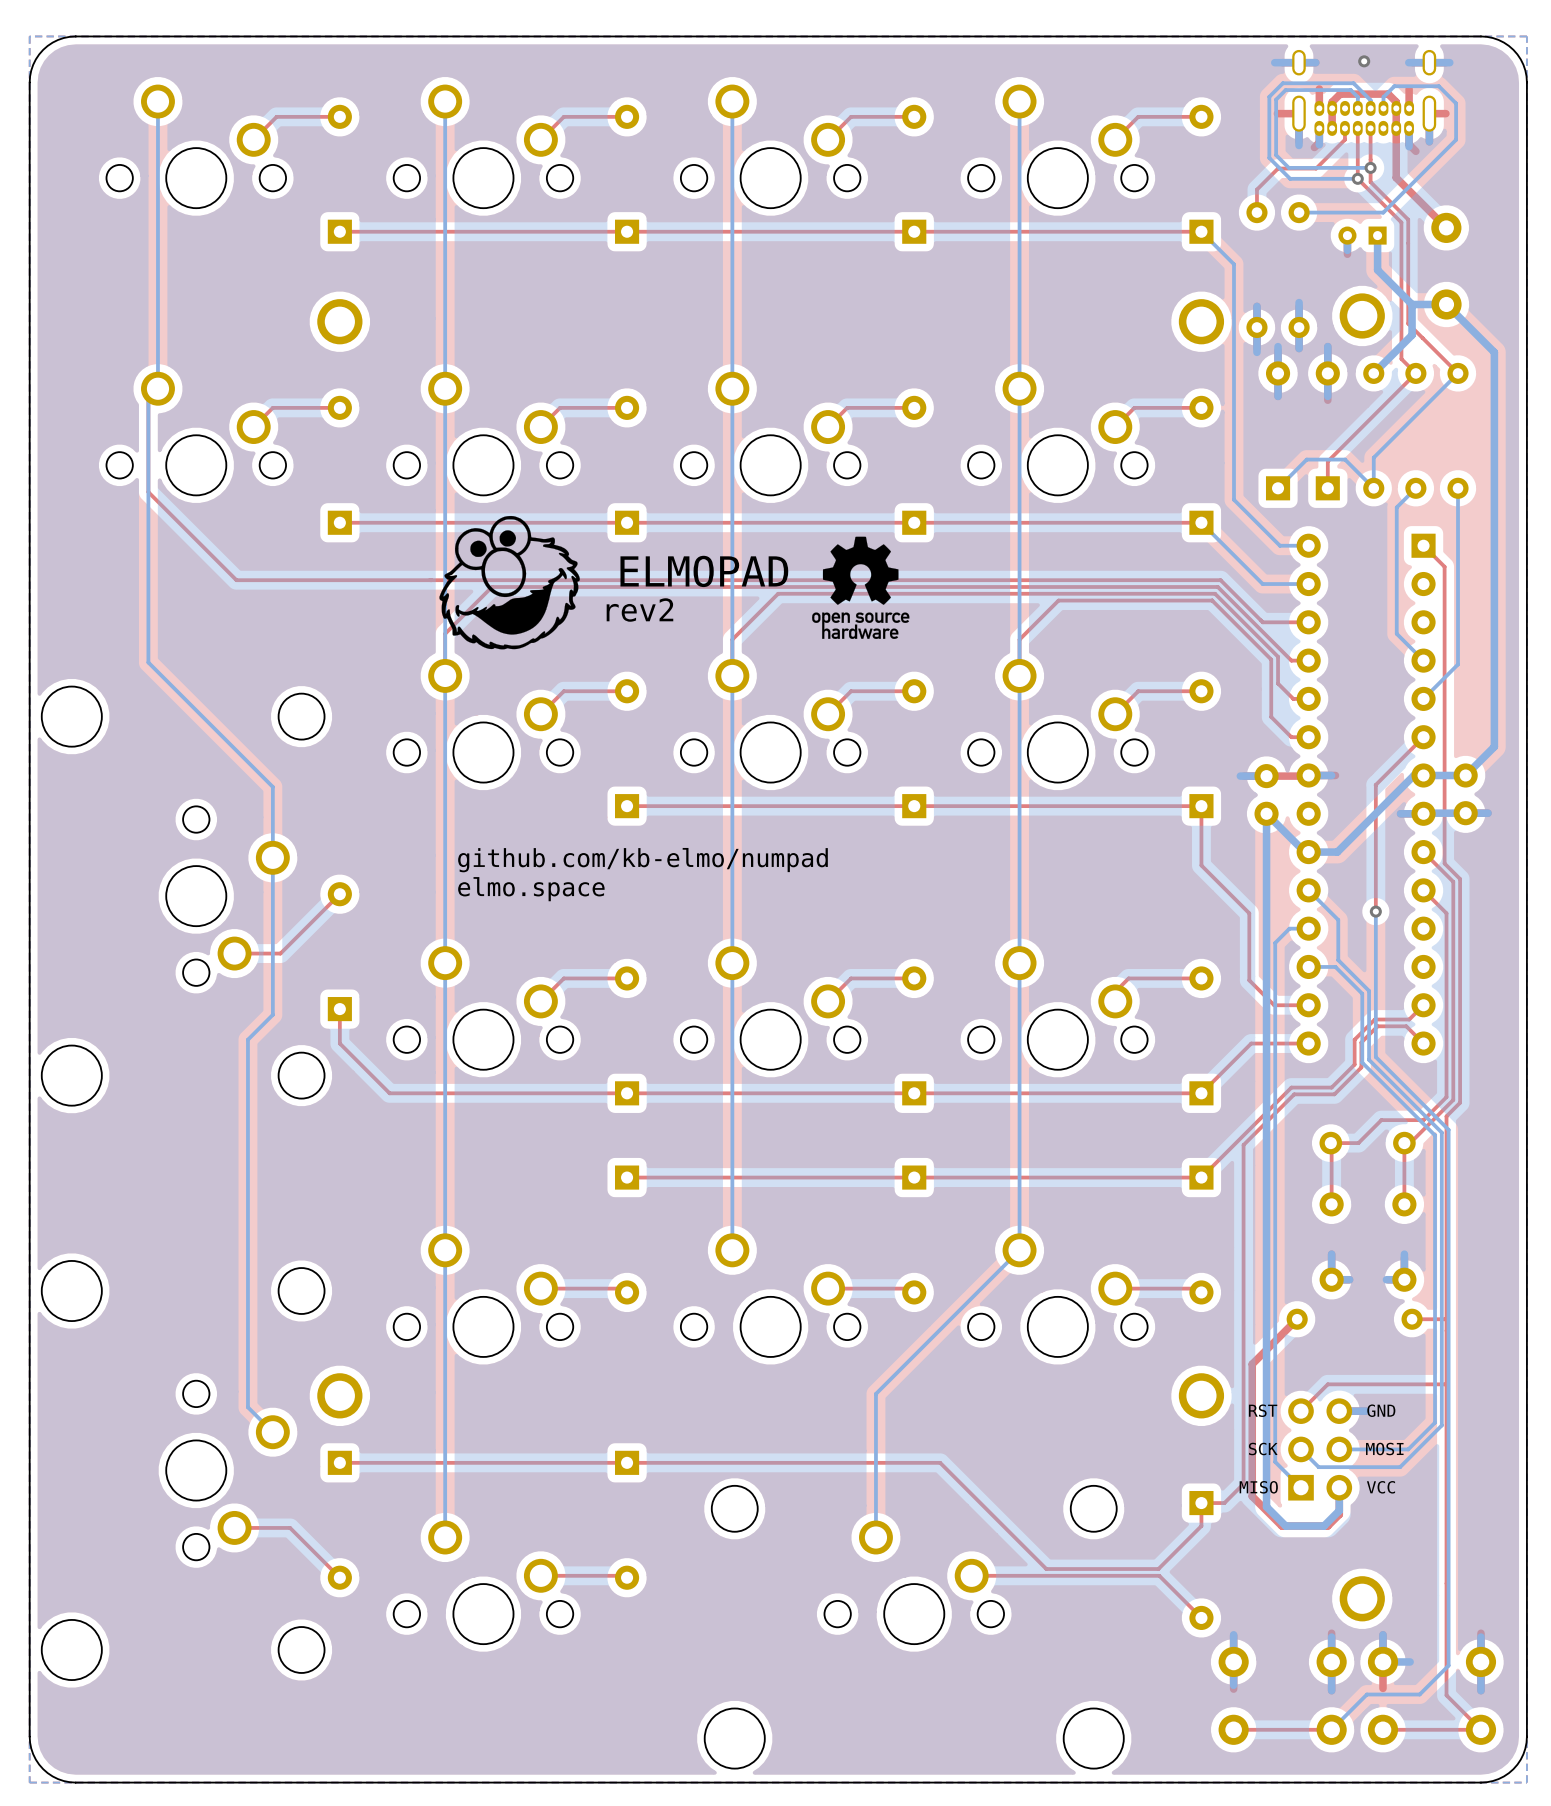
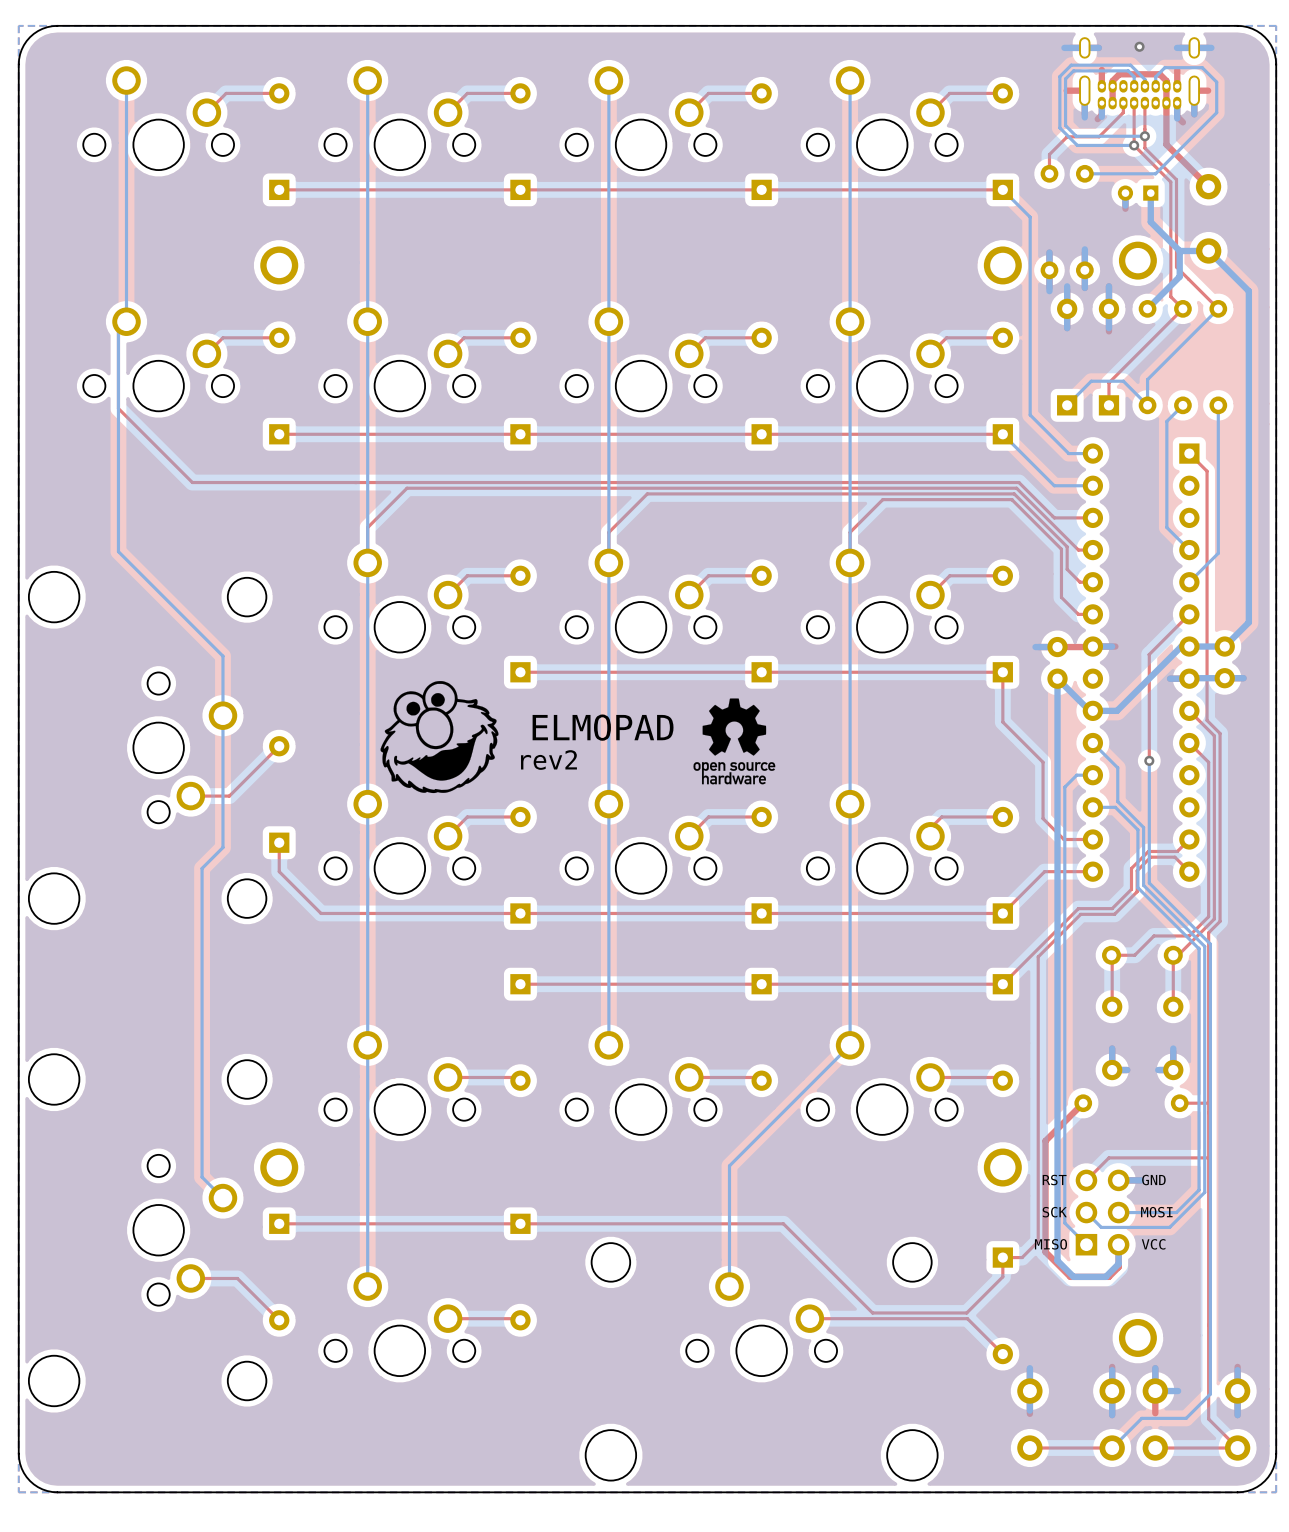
text position: ELMOPAD (704, 571) -> ELMOPAD (603, 727)
drawing position: (509, 582) -> (439, 737)
drawing position: (860, 587) -> (734, 741)
text position: rev2 (639, 610) -> rev2 (548, 760)
text: github.com/kb-elmo/numpad (642, 860) -> none
text: elmo.space (531, 889) -> none

